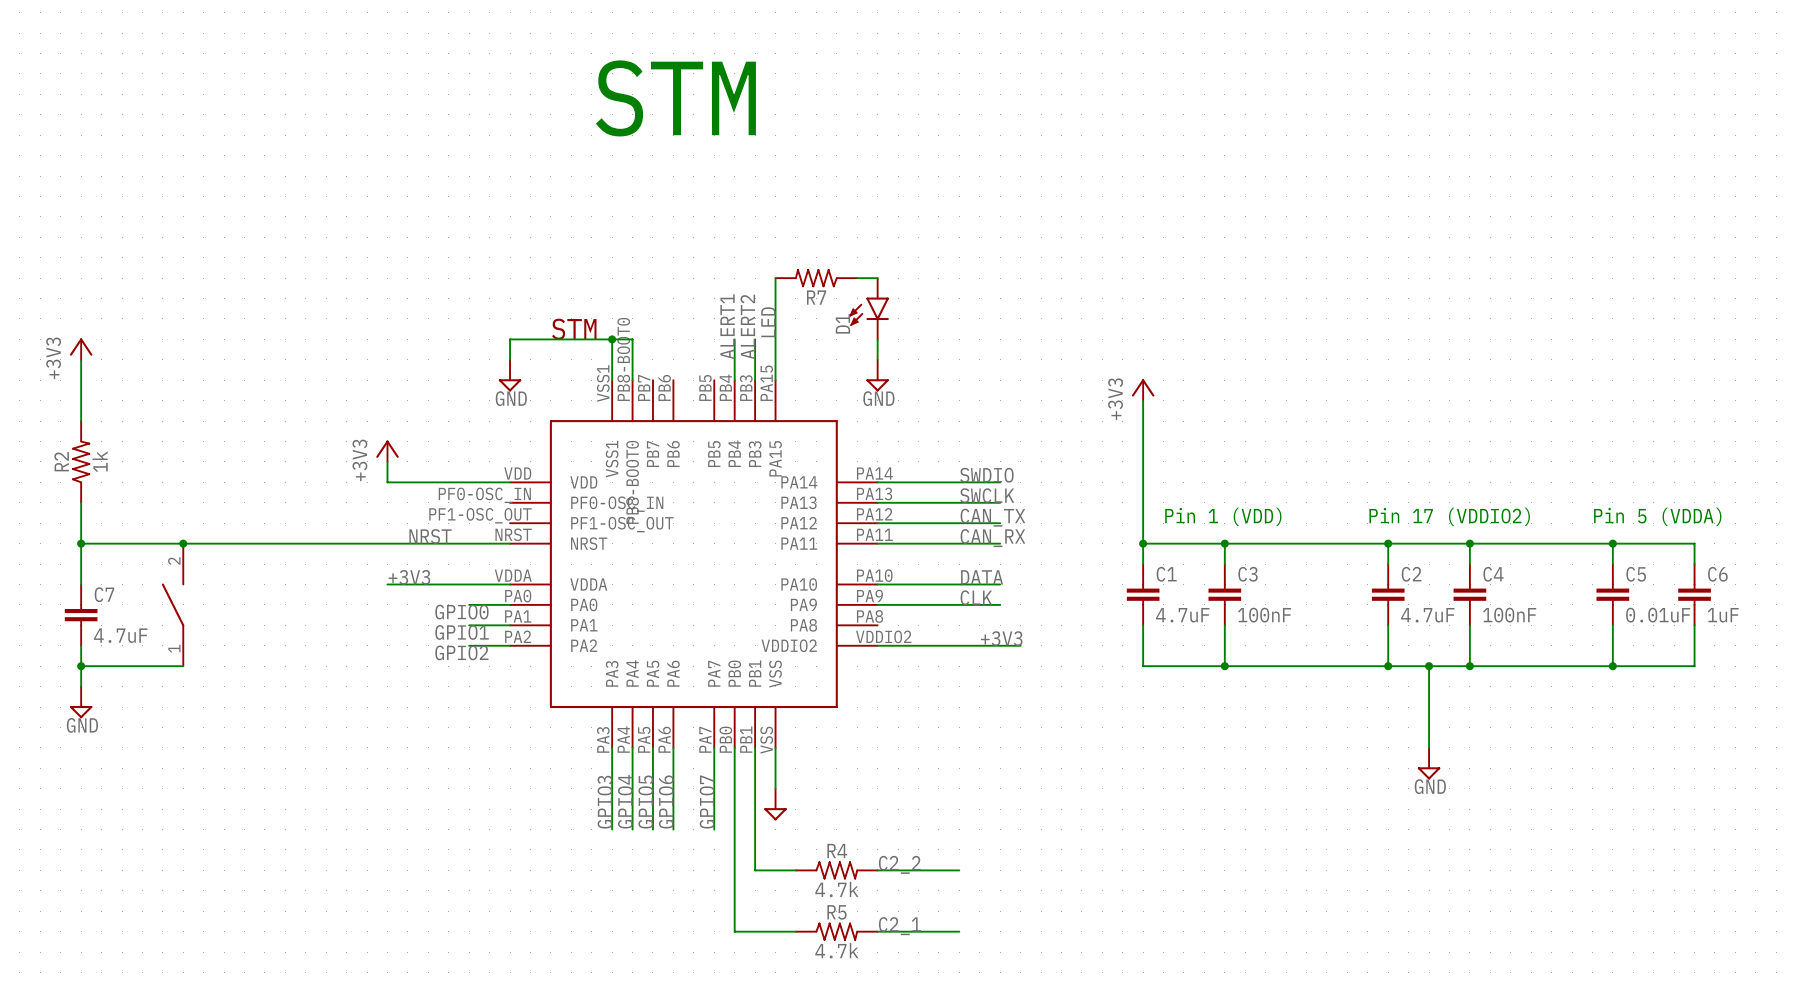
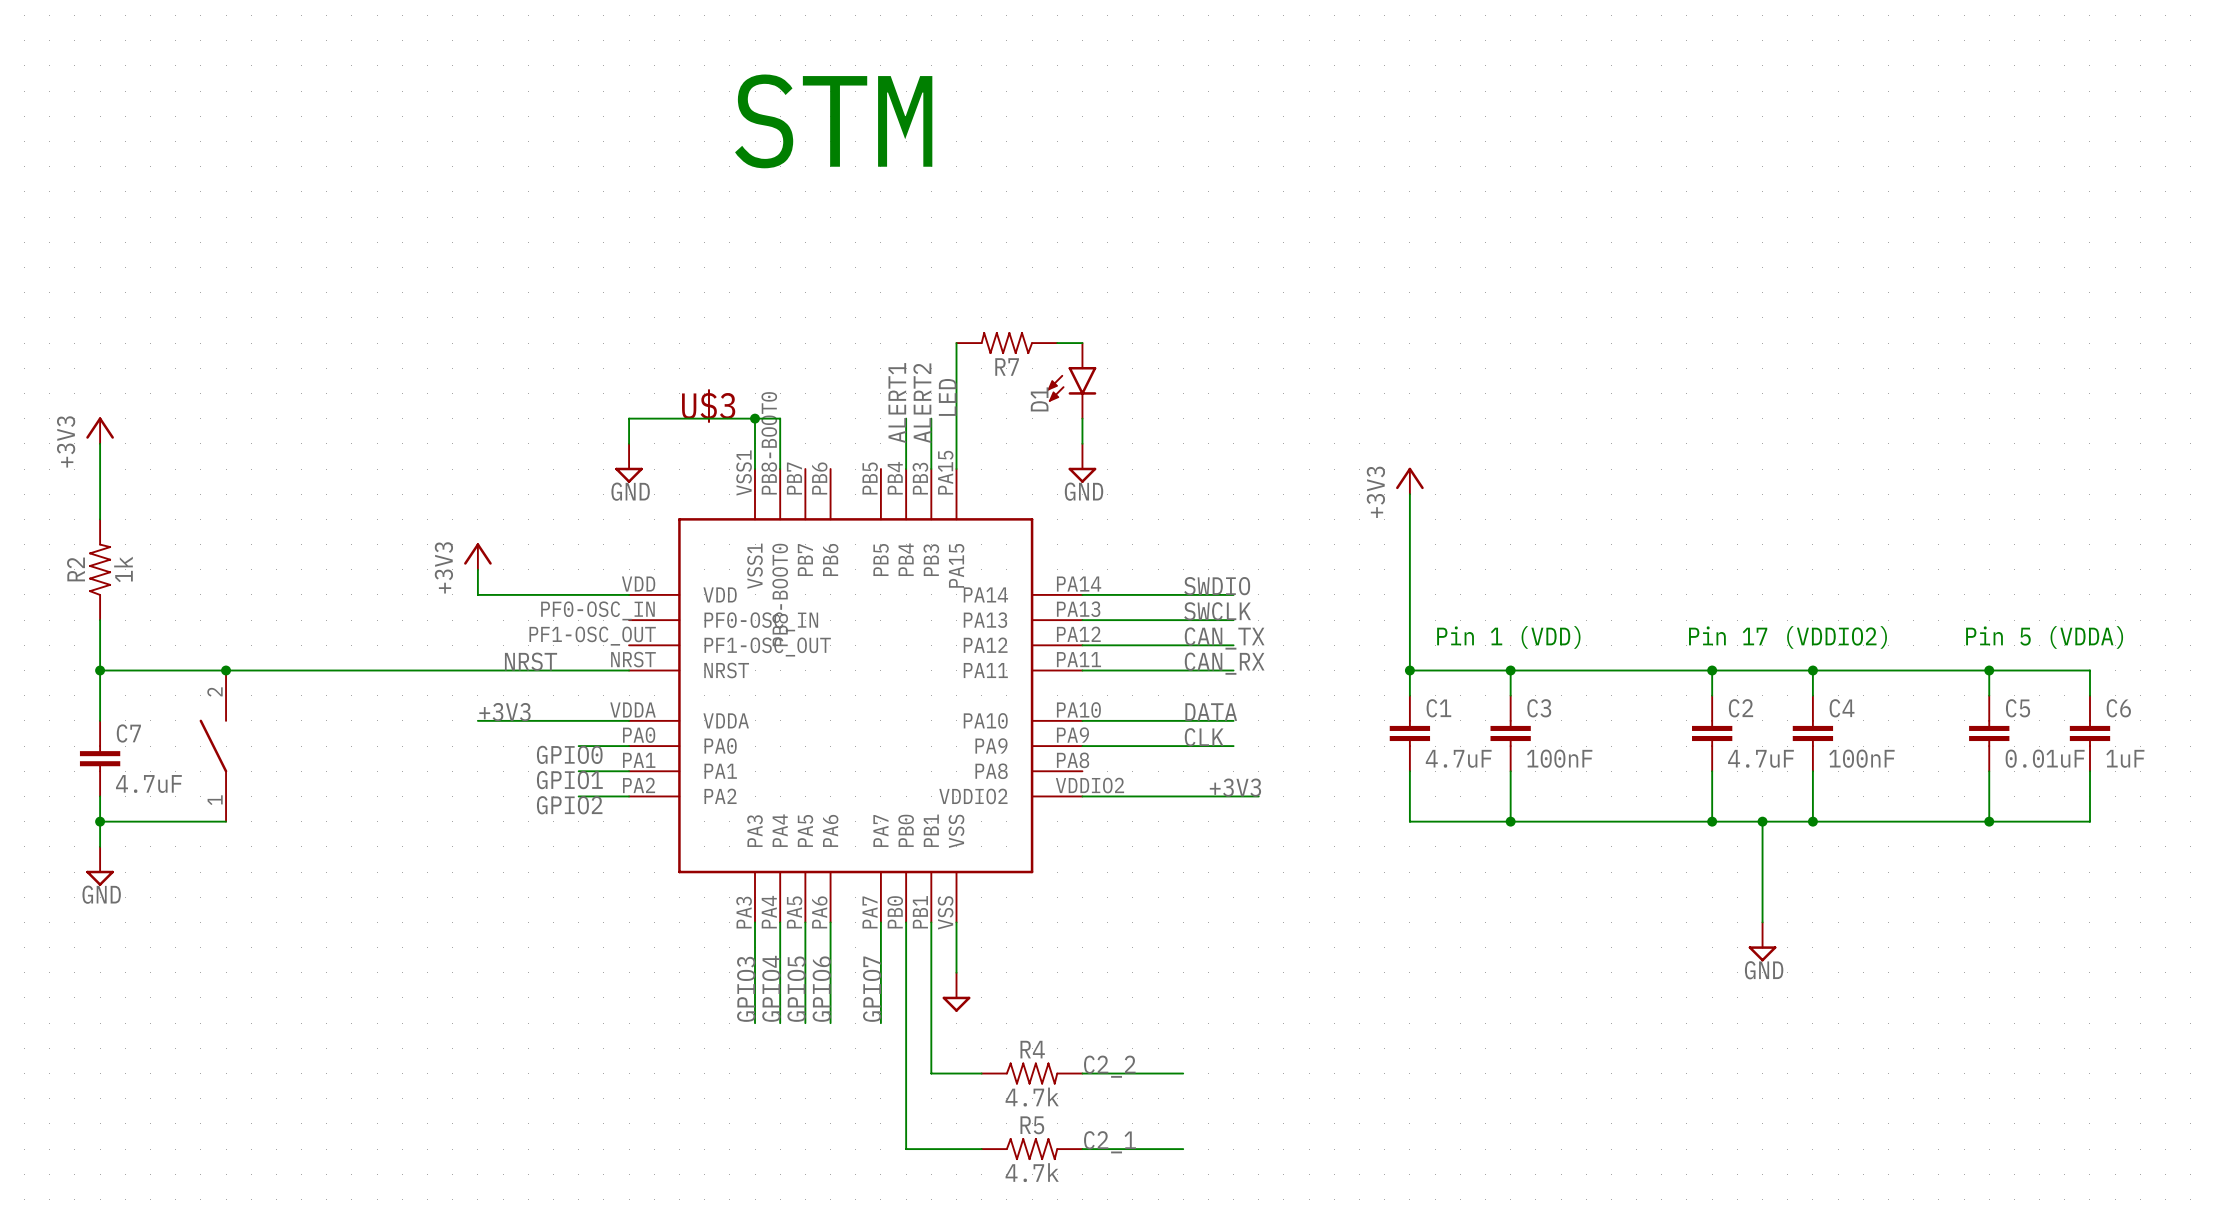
STM name: STM (574, 329) -> U$3 (708, 406)

